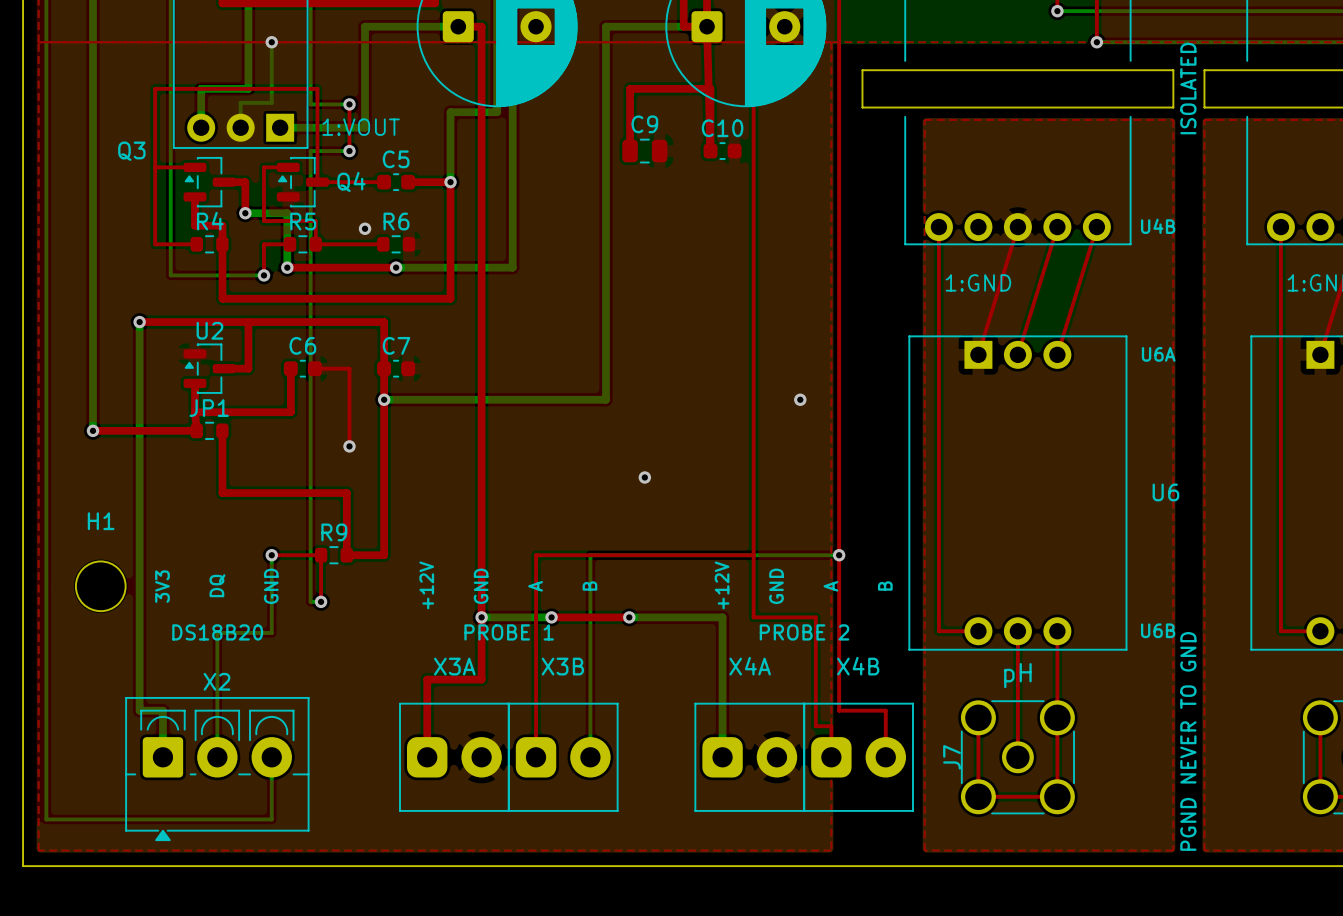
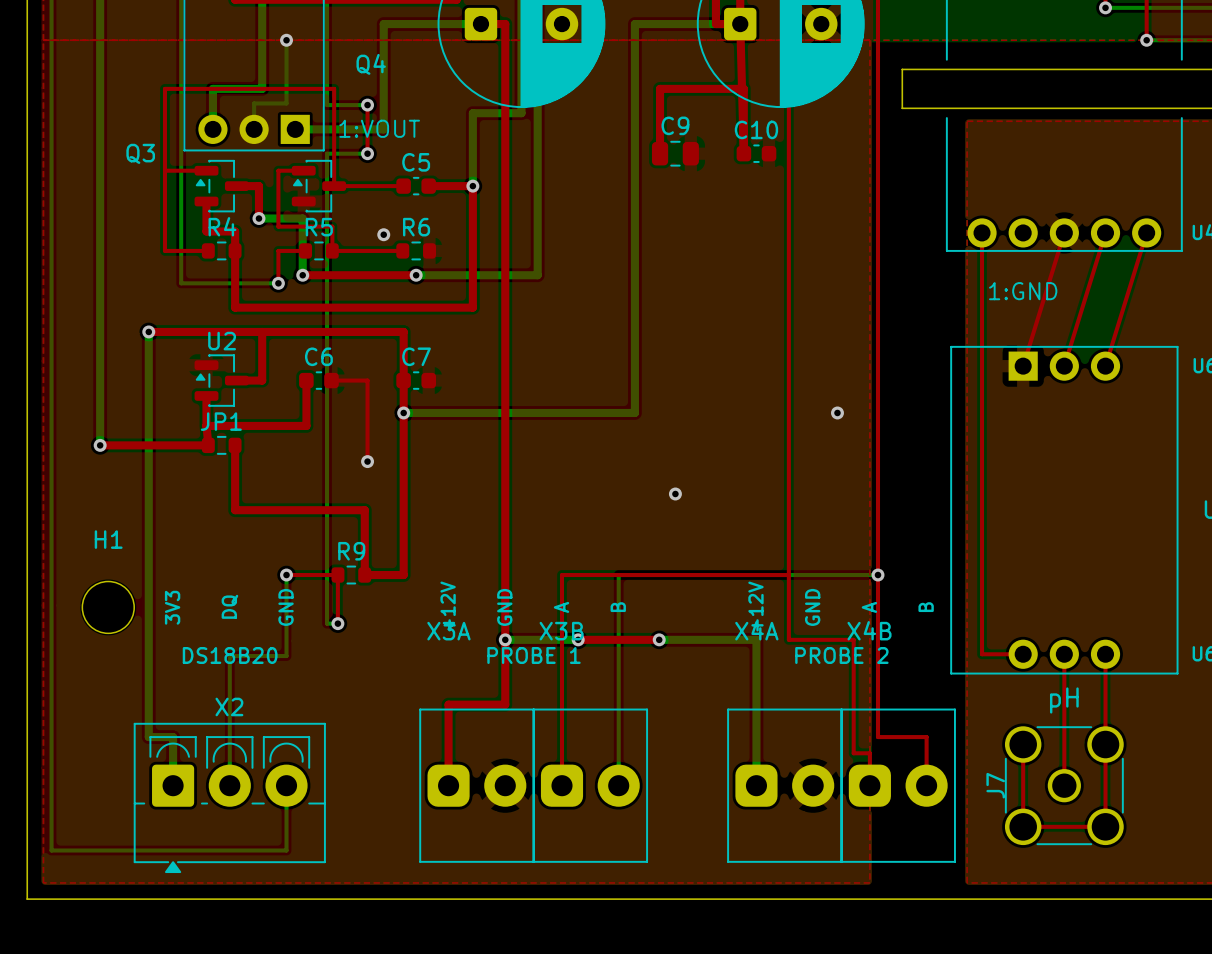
Q4 name position: Q4 (351, 181) -> Q4 (371, 64)
X3A name position: X3A (454, 666) -> X3A (448, 631)
X3B name position: X3B (562, 666) -> X3B (561, 631)
X4A name position: X4A (750, 666) -> X4A (756, 630)
X4B name position: X4B (858, 666) -> X4B (869, 630)
X3A footprint: [399, 702, 510, 812] -> [419, 708, 535, 863]
X3B footprint: [507, 702, 619, 812] -> [532, 708, 649, 863]
X4A footprint: [694, 702, 806, 812] -> [727, 708, 843, 863]
X4B footprint: [803, 702, 914, 812] -> [840, 708, 956, 863]

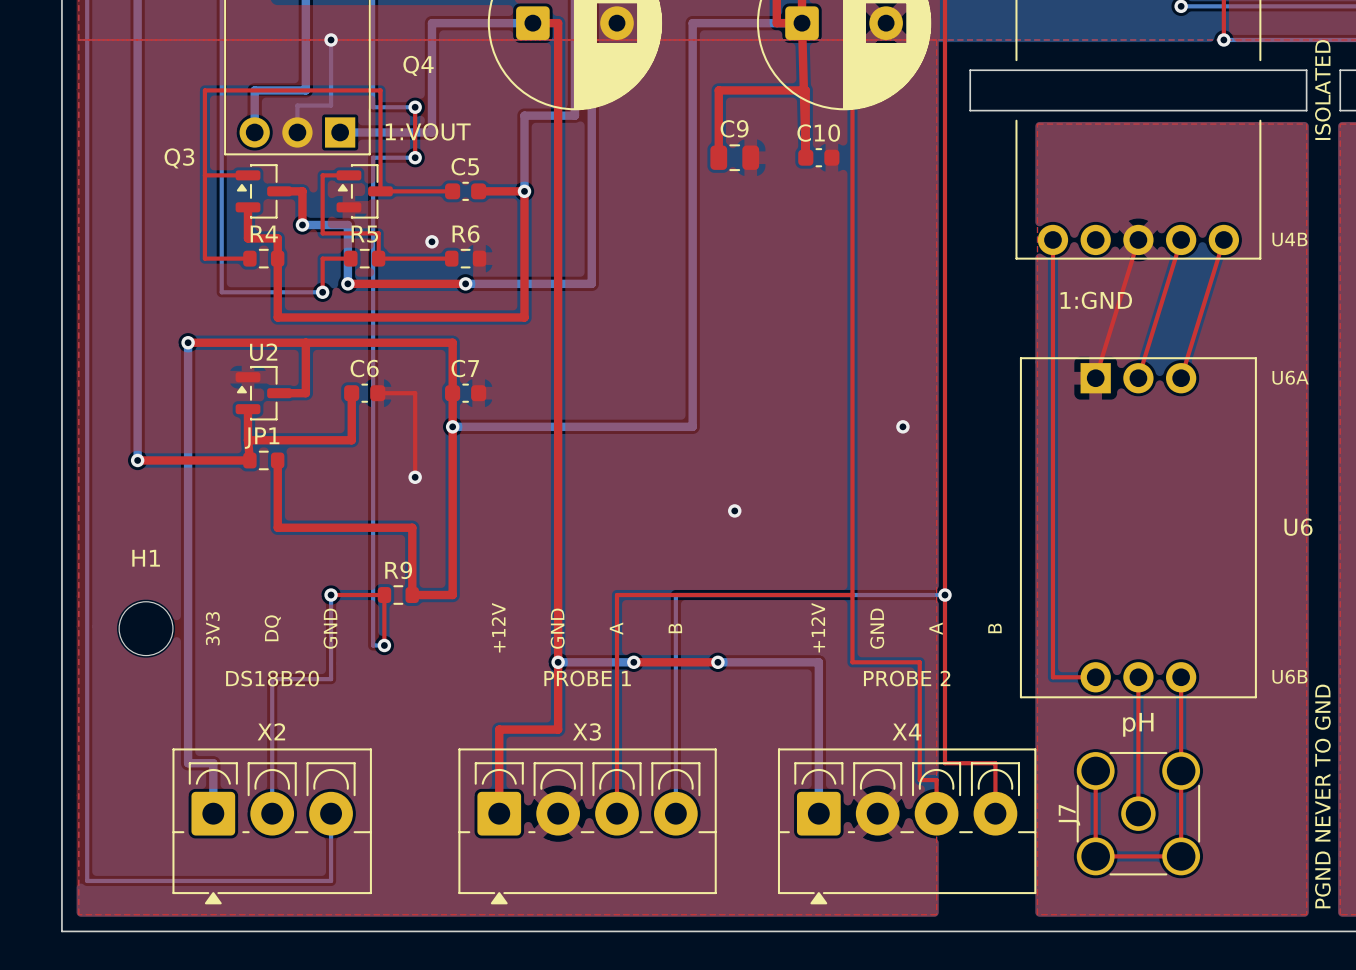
X3A: (476, 785) -> none
X3B: (590, 785) -> none
X4A: (784, 785) -> none
X4B: (898, 785) -> none
X3: none -> (587, 826)
X4: none -> (907, 826)

